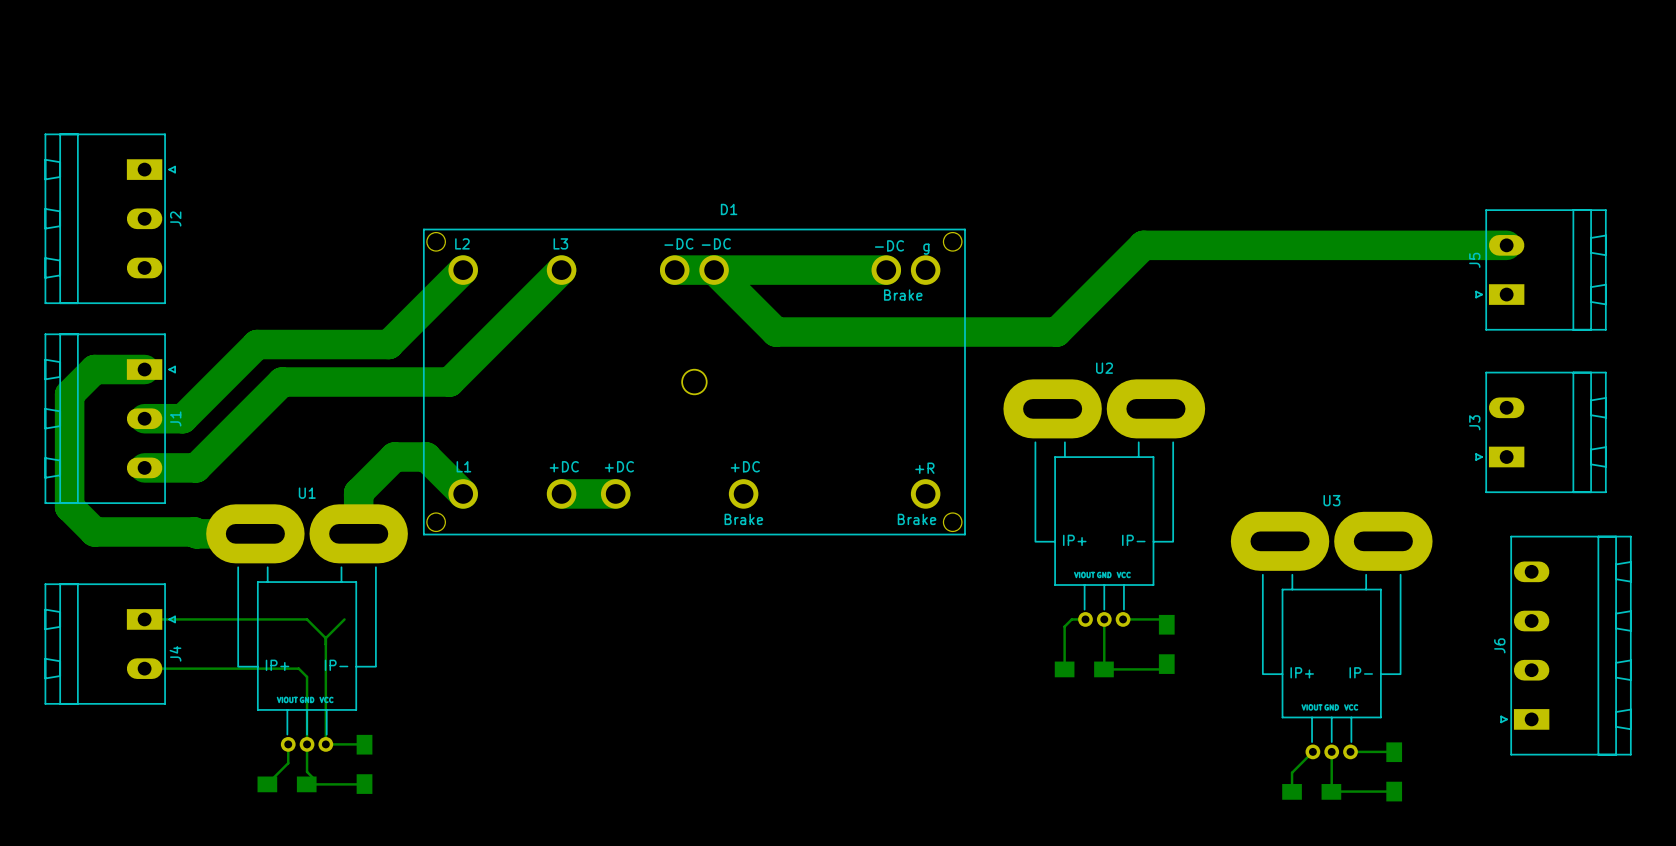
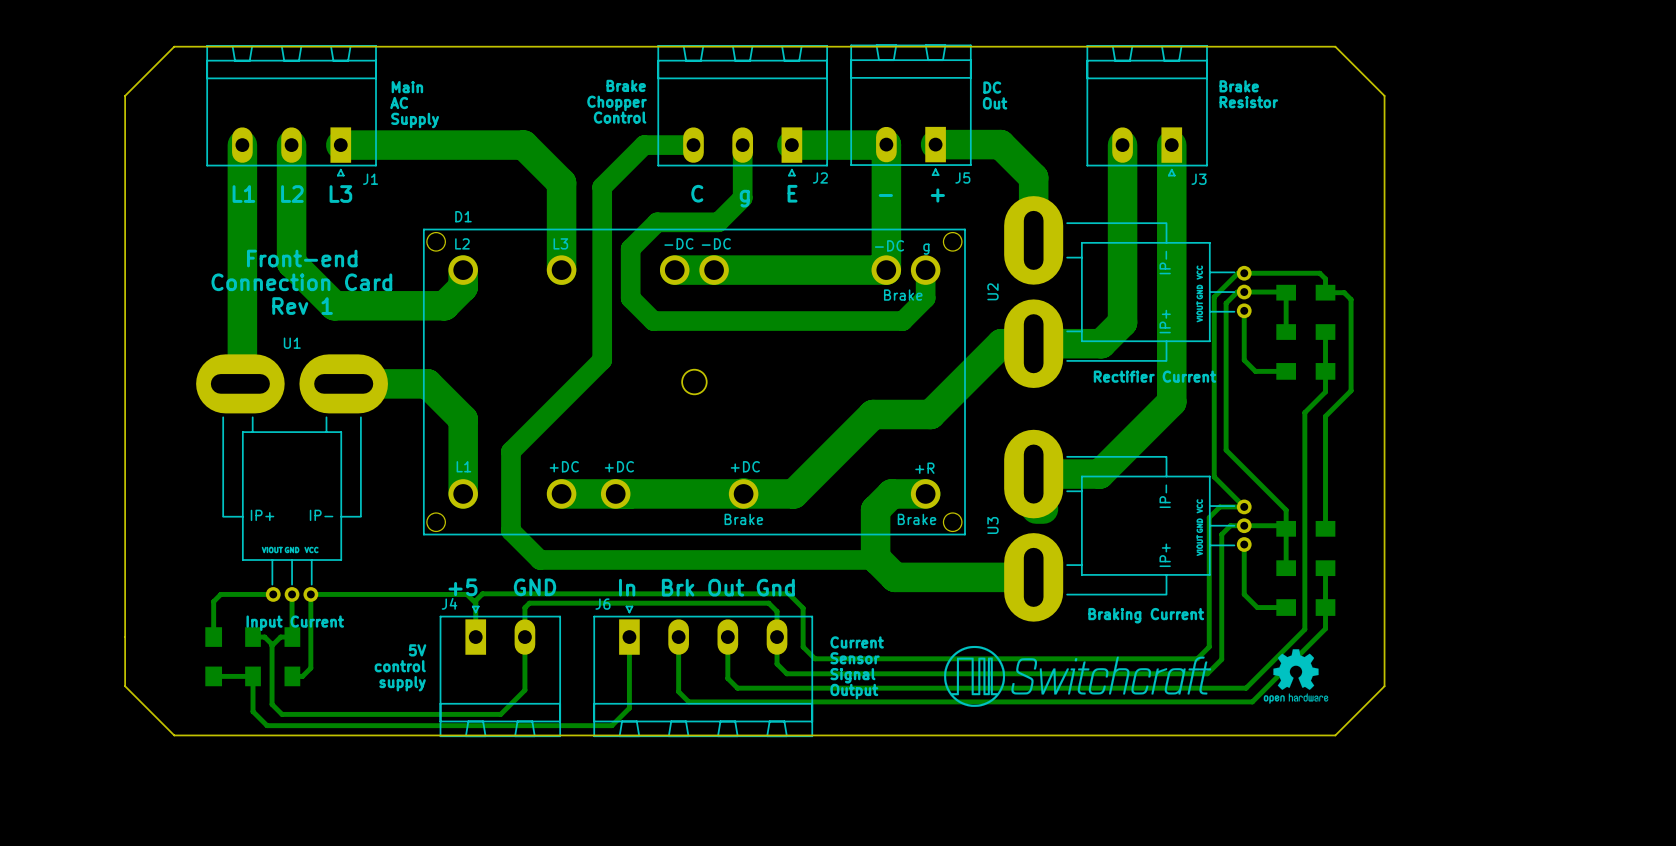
board edge: none -> (174, 46) (125, 95) (125, 686) (174, 735) (1335, 735) (1384, 686) (1384, 95) (1335, 46) (174, 46)
text: none -> Brake (626, 85)
text: none -> Brake (1239, 86)
text: none -> Main (407, 87)
text: none -> DC (992, 87)
text: none -> AC (399, 102)
text: none -> Resistor (1248, 102)
text: none -> Chopper (617, 103)
text: none -> Out (995, 103)
text: none -> Control (620, 117)
text: none -> Supply (415, 120)
bottom track: none -> (935, 144) (1000, 144) (1033, 177) (1033, 240)
bottom track: none -> (242, 145) (242, 383)
bottom track: none -> (693, 145) (644, 145) (602, 187) (602, 360) (510, 451) (510, 530) (539, 559) (877, 559)
bottom track: none -> (742, 145) (742, 198) (718, 222) (657, 222) (630, 248) (630, 298) (653, 321) (902, 321) (925, 298) (925, 270)
bottom track: none -> (791, 145) (886, 144) (886, 269)
bottom track: none -> (1122, 145) (1122, 322) (1101, 343) (1001, 343) (930, 414) (873, 414) (793, 493) (615, 493)
bottom track: none -> (1171, 145) (1171, 402) (1099, 474) (1033, 474)
text: none -> L1 L2 L3 (292, 194)
text: none -> - + (911, 195)
text: none -> C g E (744, 196)
D1 name position: D1 (729, 209) -> D1 (463, 216)
J2 rotation: 0° (110, 218) -> 90° clockwise (742, 110)
J2 position: (110, 218) -> (742, 110)
J2 name position: J2 (175, 219) -> J2 (820, 177)
bottom track: (1506, 245) (1143, 245) (1056, 332) (776, 332) (714, 270) -> none
text: none -> Front-end (302, 258)
J5 name position: J5 (1474, 260) -> J5 (962, 177)
J5 rotation: 0° (1540, 269) -> 90° counterclockwise (910, 110)
J5 position: (1540, 269) -> (910, 110)
bottom track: (463, 270) (388, 344) (257, 344) (182, 418) (144, 418) -> (463, 270) (463, 287) (444, 305) (334, 305) (291, 262) (291, 145)
bottom track: (561, 270) (449, 382) (282, 382) (196, 467) (144, 467) -> (561, 270) (561, 182) (523, 145) (340, 145)
text: none -> Connection Card (301, 282)
bottom track: none -> (1286, 292) (1286, 332)
bottom track: none -> (1292, 292) (1237, 292) (1226, 303) (1226, 450) (1286, 510) (1286, 568)
part: none -> (1305, 292)
text: none -> Rev 1 (302, 306)
bottom track: none -> (1244, 311) (1244, 360) (1255, 371) (1286, 371)
part: none -> (1305, 332)
bottom track: none -> (1325, 332) (1325, 391) (1304, 412) (1304, 629) (1246, 688) (737, 688) (727, 678) (727, 637)
U2 name position: U2 (1104, 368) -> U2 (992, 291)
bottom track: (144, 369) (94, 369) (69, 394) (69, 506) (94, 531) (255, 533) -> none
part: none -> (1305, 371)
text: none -> Rectifier Current (1154, 376)
U2 footprint: [1003, 379, 1206, 627] -> [1004, 196, 1252, 388]
J1 rotation: 0° (110, 418) -> 90° clockwise (291, 110)
J1 position: (110, 418) -> (291, 110)
J1 name position: J1 (175, 418) -> J1 (370, 179)
J3 name position: J3 (1474, 422) -> J3 (1199, 179)
J3 rotation: 0° (1540, 432) -> 90° counterclockwise (1147, 110)
J3 position: (1540, 432) -> (1147, 110)
bottom track: (463, 493) (426, 456) (394, 456) (358, 492) (358, 533) -> (463, 493) (463, 419) (427, 383) (346, 383)
bottom track: none -> (925, 493) (891, 493) (875, 509) (875, 557) (895, 577) (1033, 577)
U3 name position: U3 (1331, 500) -> U3 (992, 525)
U1 footprint: [206, 504, 408, 752] -> [196, 354, 388, 602]
bottom track: none -> (1036, 509) (1043, 509)
U3 footprint: [1230, 511, 1433, 760] -> [1004, 429, 1252, 622]
bottom track: none -> (1292, 524) (1292, 526) (1230, 525) (1221, 534) (1221, 659) (1207, 673) (786, 673) (777, 663) (777, 611) (768, 603) (529, 603) (524, 607) (524, 690) (500, 714) (282, 714) (272, 704) (272, 644) (264, 637) (253, 637)
part: none -> (1305, 528)
bottom track: none -> (1325, 528) (1325, 416) (1351, 390) (1351, 299) (1344, 292) (1325, 292) (1325, 278) (1319, 273) (1238, 273) (1214, 297) (1214, 476) (1244, 506) (1219, 506) (1209, 517) (1209, 646) (1197, 658) (815, 658) (803, 646) (803, 608) (788, 593) (482, 593) (475, 600) (475, 637)
bottom track: none -> (1243, 545) (1244, 594) (1257, 607) (1286, 607)
part: none -> (1305, 568)
bottom track: none -> (1325, 568) (1325, 628) (1252, 701) (688, 701) (678, 691) (678, 637)
text: none -> +5 GND (502, 587)
text: none -> In Brk Out Gnd (706, 587)
bottom track: none -> (273, 594) (220, 594) (213, 601) (213, 637)
bottom track: none -> (292, 594) (292, 637) (280, 637) (272, 645)
bottom track: none -> (475, 603) (466, 594) (310, 594) (310, 668) (302, 676) (292, 676)
part: none -> (1305, 607)
text: none -> Braking Current (1146, 615)
bottom track: (144, 619) (307, 619) (325, 638) -> none
bottom track: (344, 619) (325, 638) (325, 744) (364, 744) -> none
bottom track: (1085, 619) (1071, 619) (1064, 626) (1064, 669) -> none
bottom track: (1104, 619) (1103, 669) (1161, 669) (1166, 664) -> none
bottom track: (1123, 619) (1161, 619) (1166, 624) -> none
text: none -> Input Current (295, 623)
bottom track: none -> (629, 637) (629, 708) (611, 725) (267, 725) (253, 711) (253, 676) (213, 676)
text: none -> Current (857, 642)
J4 rotation: 0° (110, 644) -> 90° counterclockwise (500, 671)
J4 position: (110, 644) -> (500, 671)
part: (1166, 644) -> none
drawing: none -> [944, 645, 1212, 707]
J6 name position: J6 (1499, 645) -> J6 (602, 604)
J6 rotation: 0° (1565, 645) -> 90° clockwise (703, 671)
J6 position: (1565, 645) -> (703, 671)
drawing: none -> [1263, 649, 1329, 704]
text: none -> 5V (417, 650)
J4 name position: J4 (175, 653) -> J4 (449, 603)
part: none -> (213, 656)
part: none -> (253, 656)
part: none -> (292, 656)
text: none -> Sensor (855, 658)
text: none -> control (400, 666)
bottom track: (144, 668) (298, 668) (307, 676) (307, 771) (314, 779) -> none
part: (1084, 669) -> none
text: none -> Signal (852, 675)
text: none -> supply (402, 683)
text: none -> Output (854, 691)
bottom track: (288, 744) (288, 763) (272, 779) -> none
bottom track: (1312, 751) (1292, 772) (1292, 791) -> none
bottom track: (1331, 751) (1331, 791) -> none
bottom track: (1350, 751) (1394, 752) -> none
part: (364, 764) -> none
part: (1394, 771) -> none
part: (287, 784) -> none
bottom track: (364, 784) (306, 784) -> none
part: (1311, 791) -> none
bottom track: (1331, 791) (1394, 791) -> none

